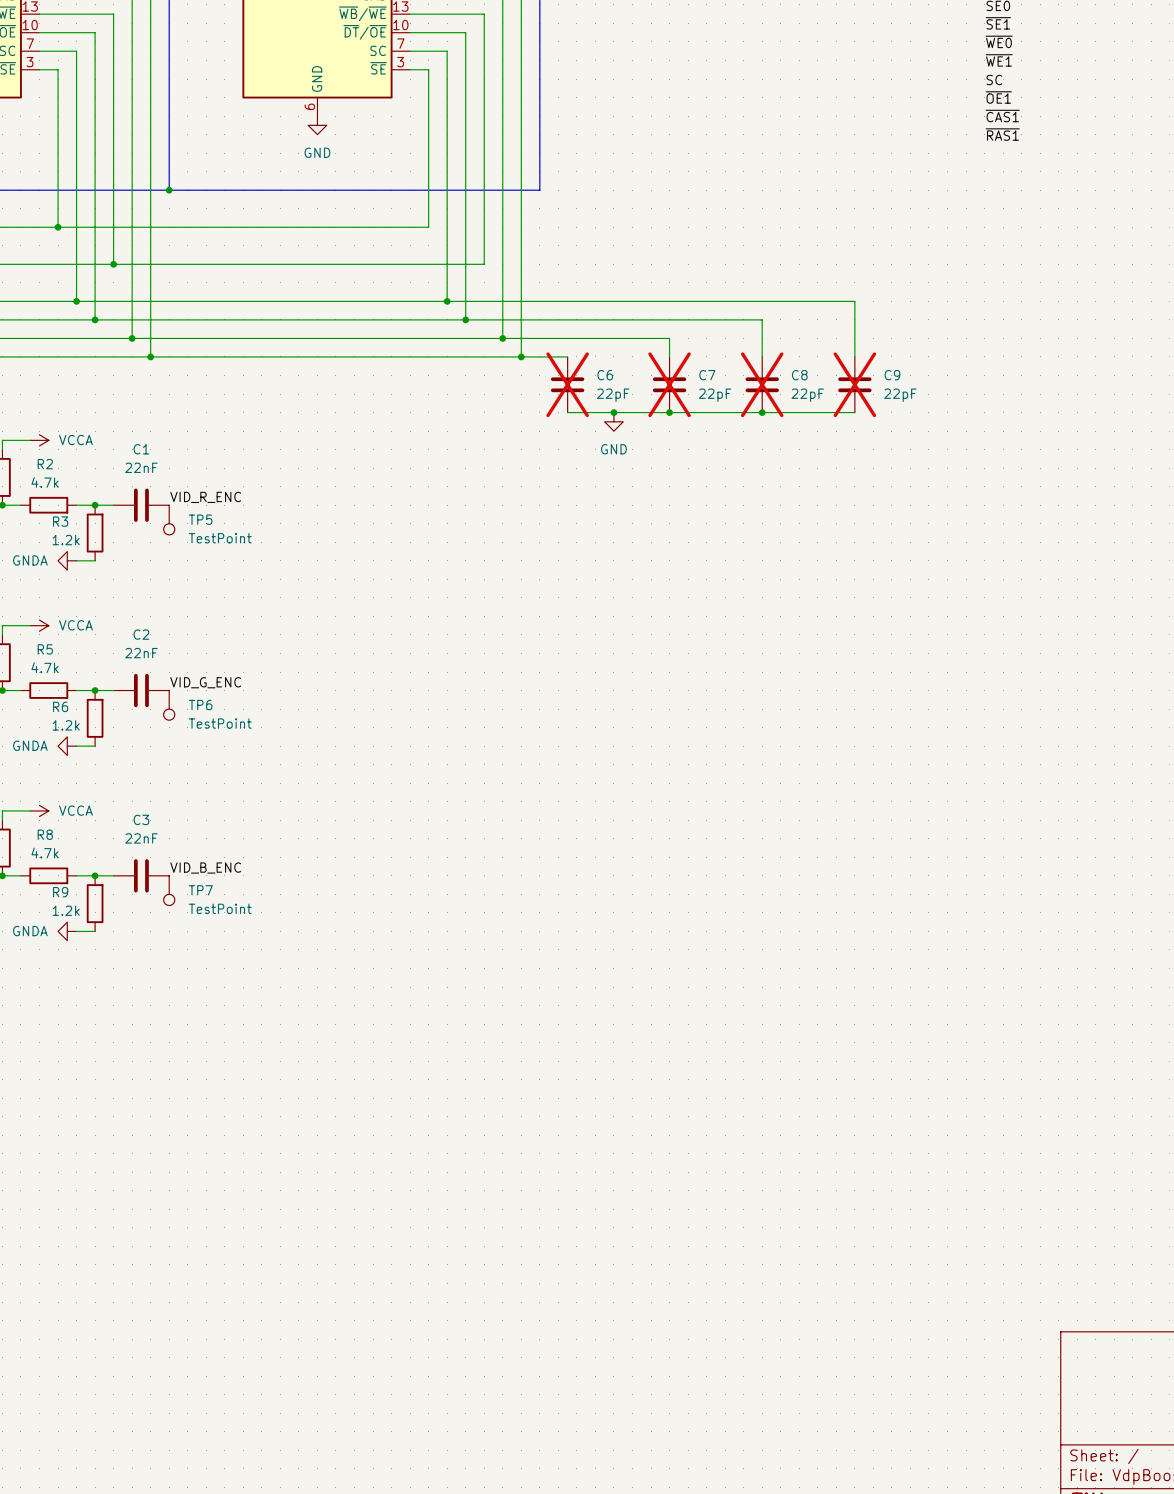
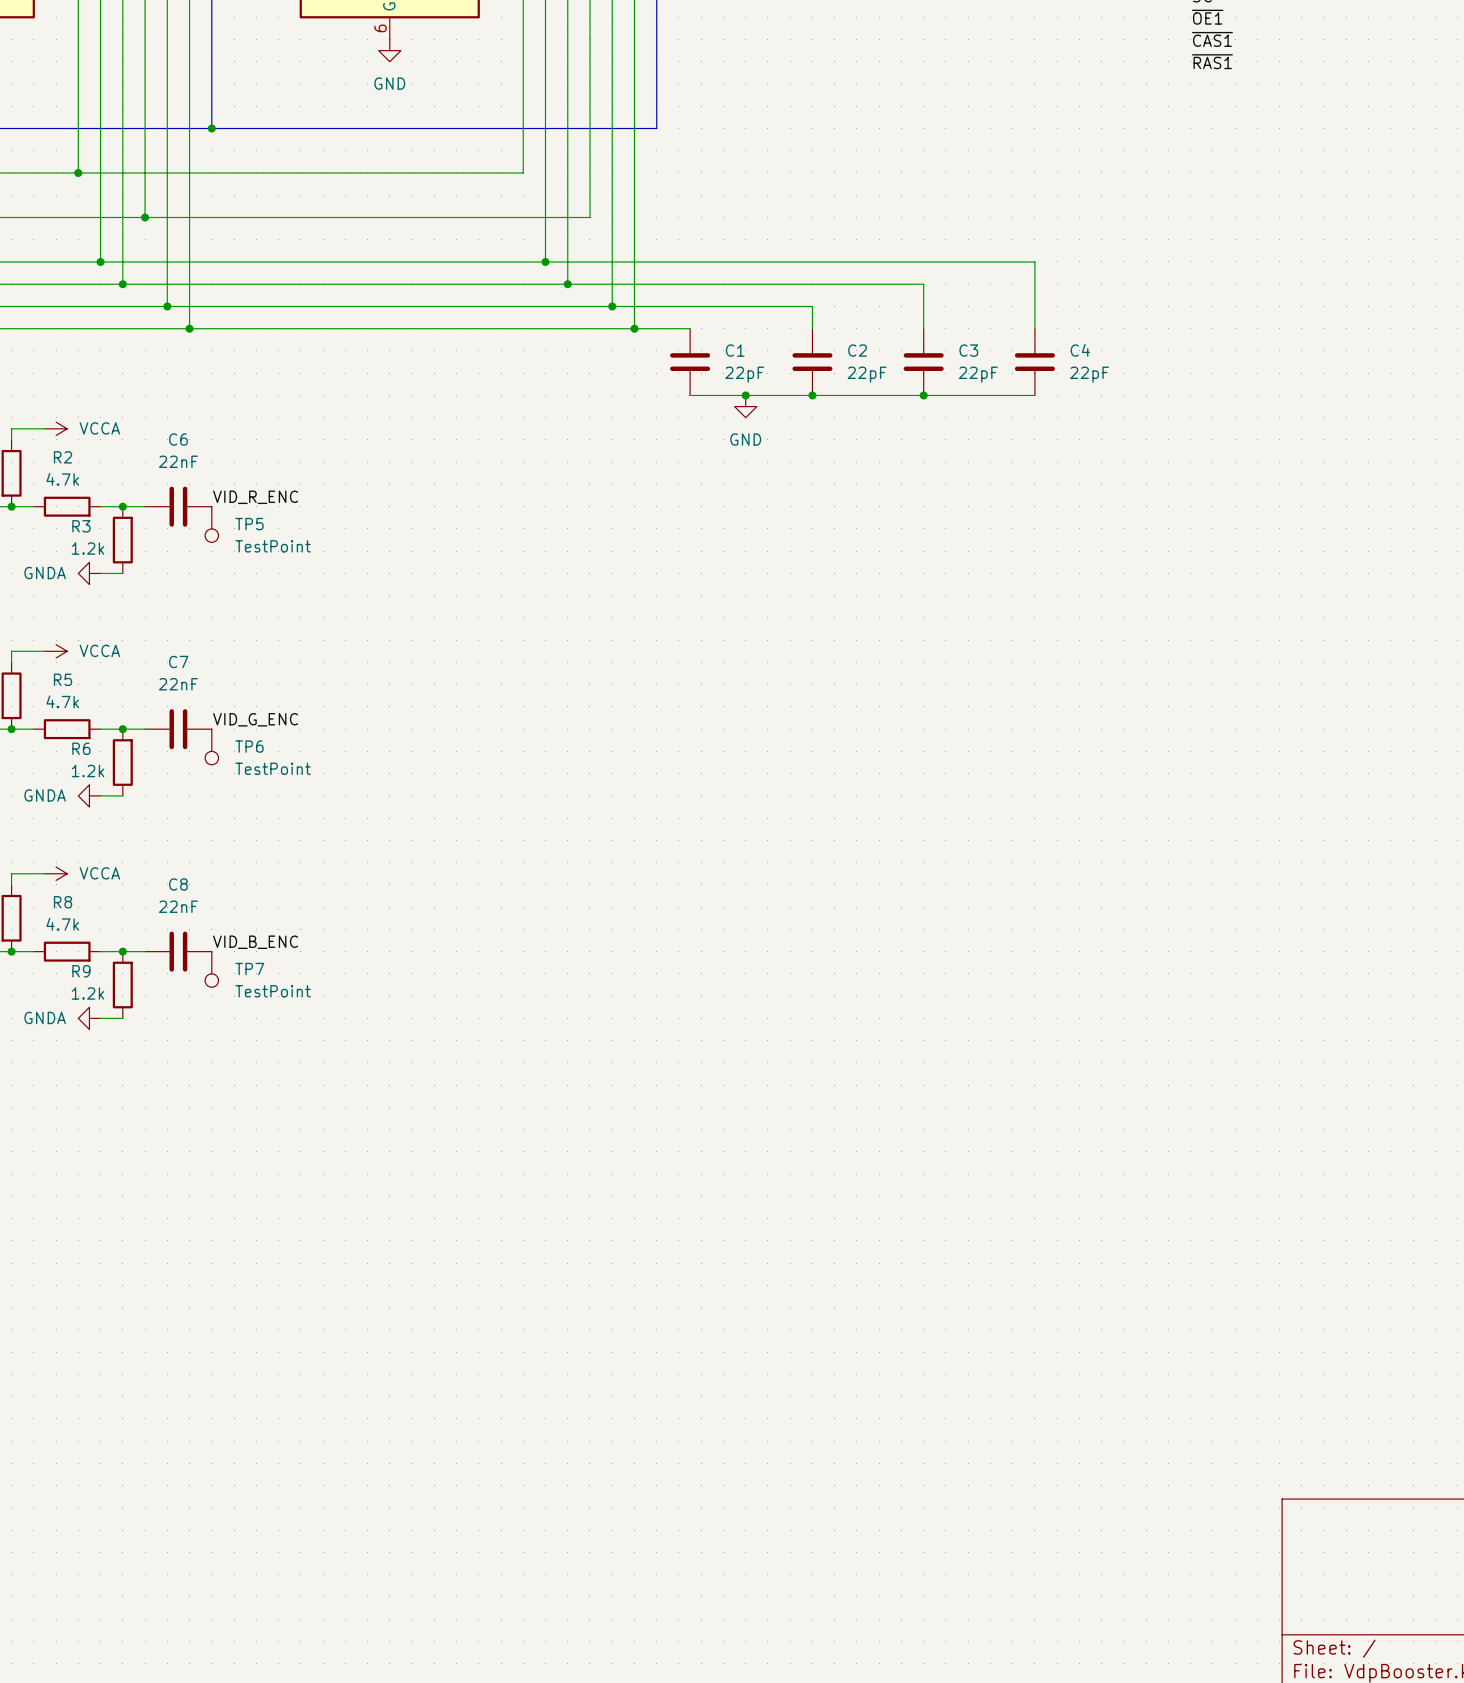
C6 name: C6 (605, 375) -> C1 (735, 350)
C7 name: C7 (707, 375) -> C2 (857, 350)
C8 name: C8 (799, 375) -> C3 (968, 350)
C9 name: C9 (892, 375) -> C4 (1080, 350)
C6 do-not-place cross: (567, 384) -> none
C7 do-not-place cross: (669, 384) -> none
C8 do-not-place cross: (762, 384) -> none
C9 do-not-place cross: (854, 384) -> none
C1 name: C1 (141, 449) -> C6 (178, 439)
C2 name: C2 (141, 634) -> C7 (178, 662)
C3 name: C3 (141, 819) -> C8 (178, 884)

